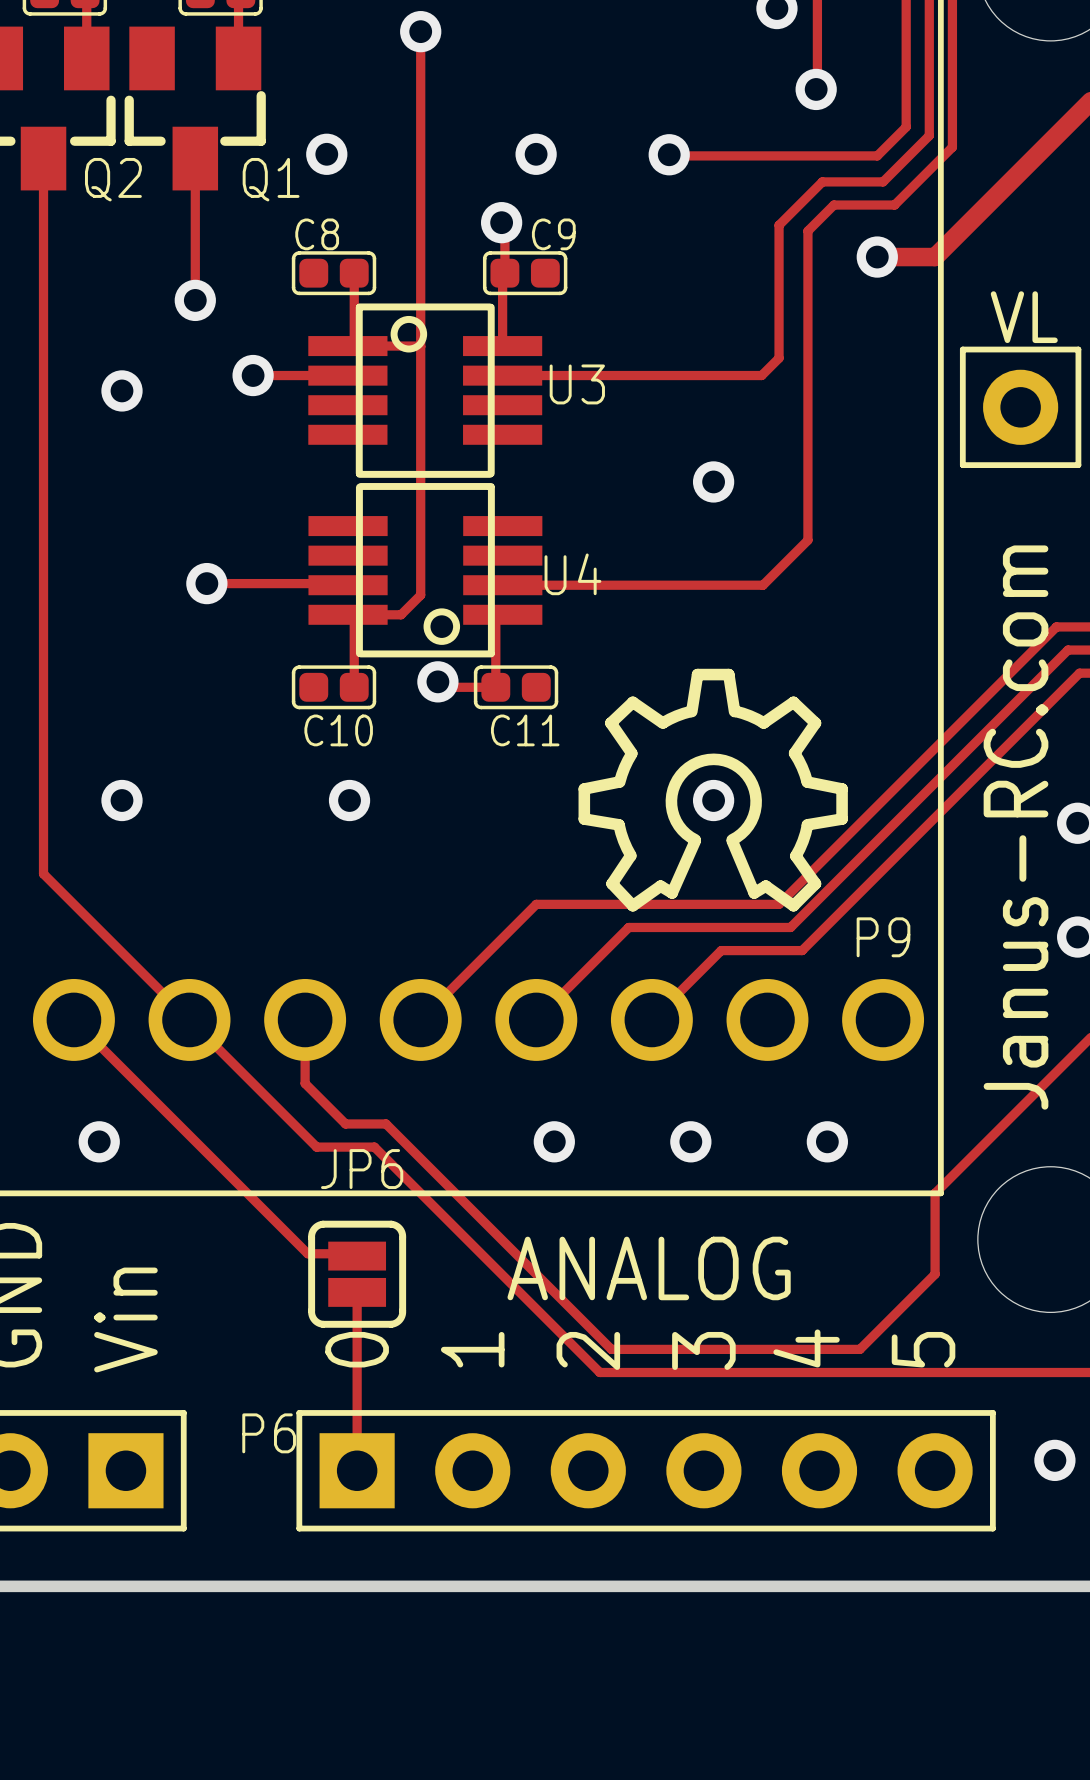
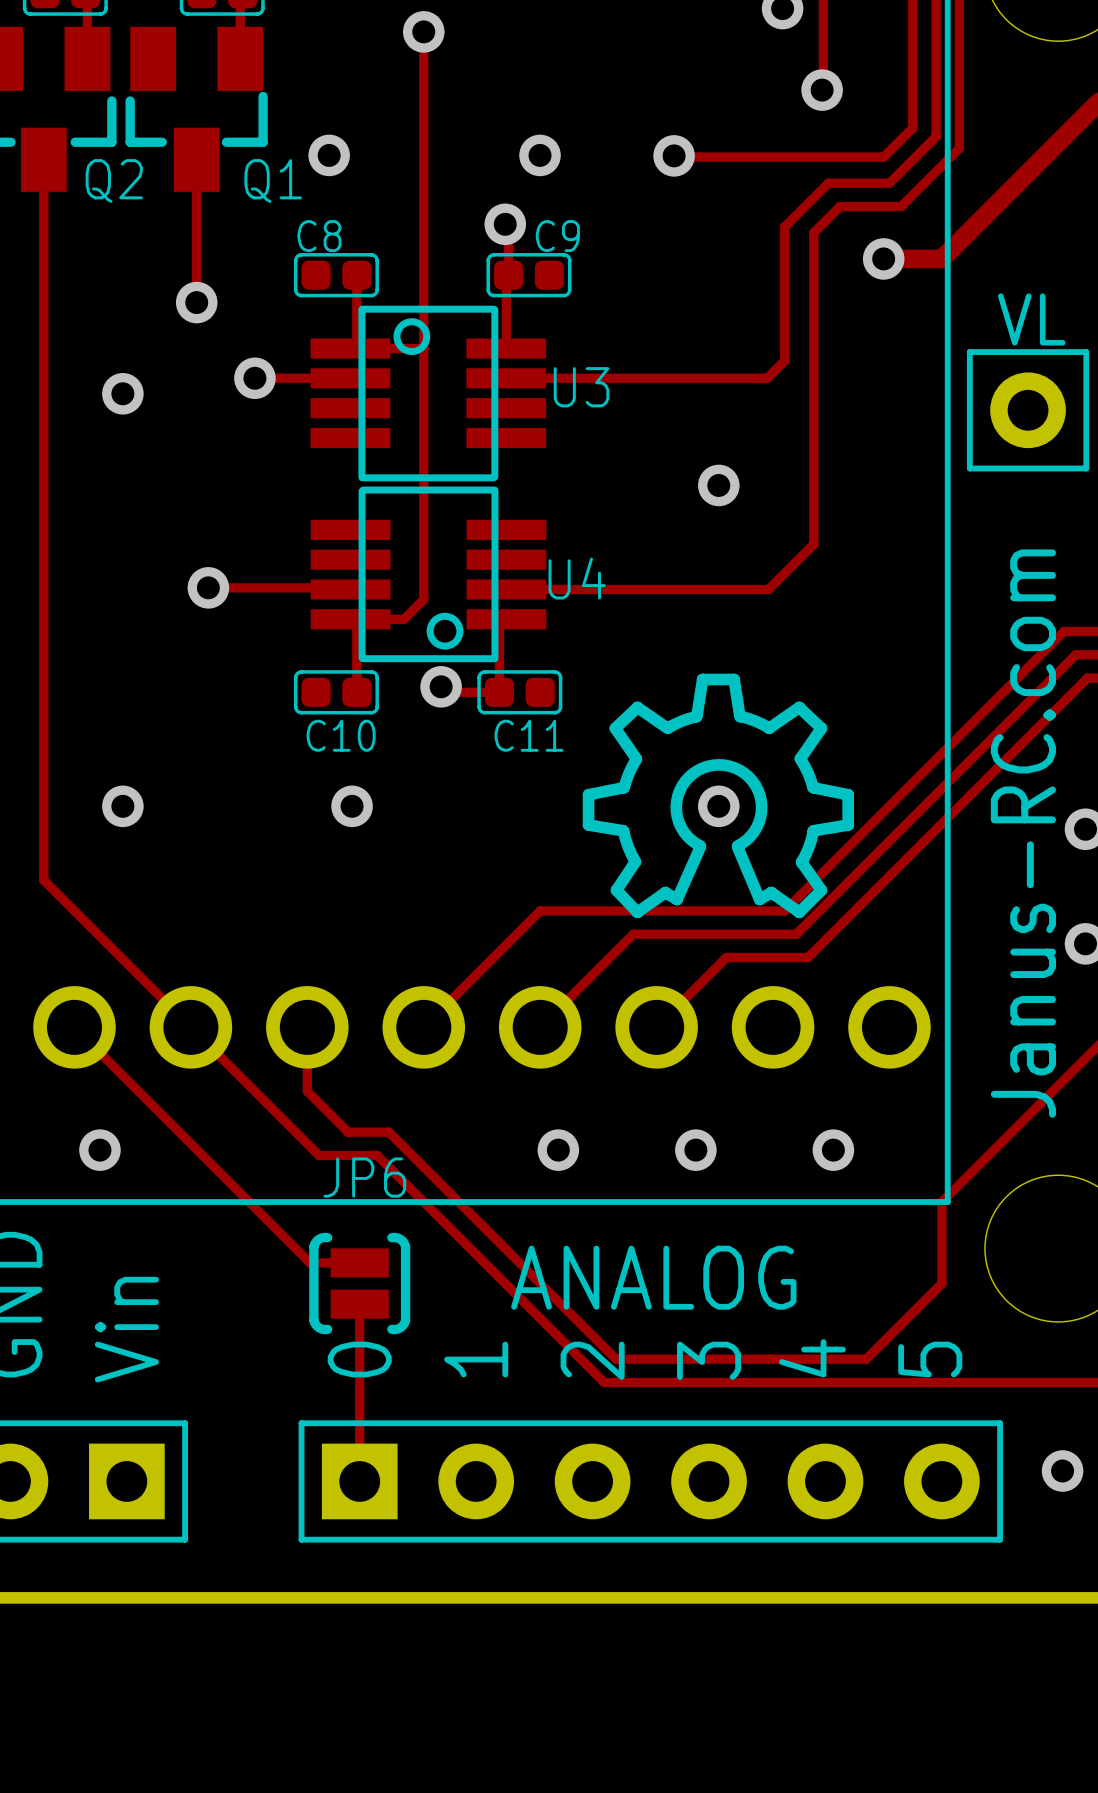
text: P9 (883, 937) -> none
JP6 footprint: [308, 1220, 407, 1328] -> [309, 1232, 411, 1335]
text: P6 (269, 1433) -> none

